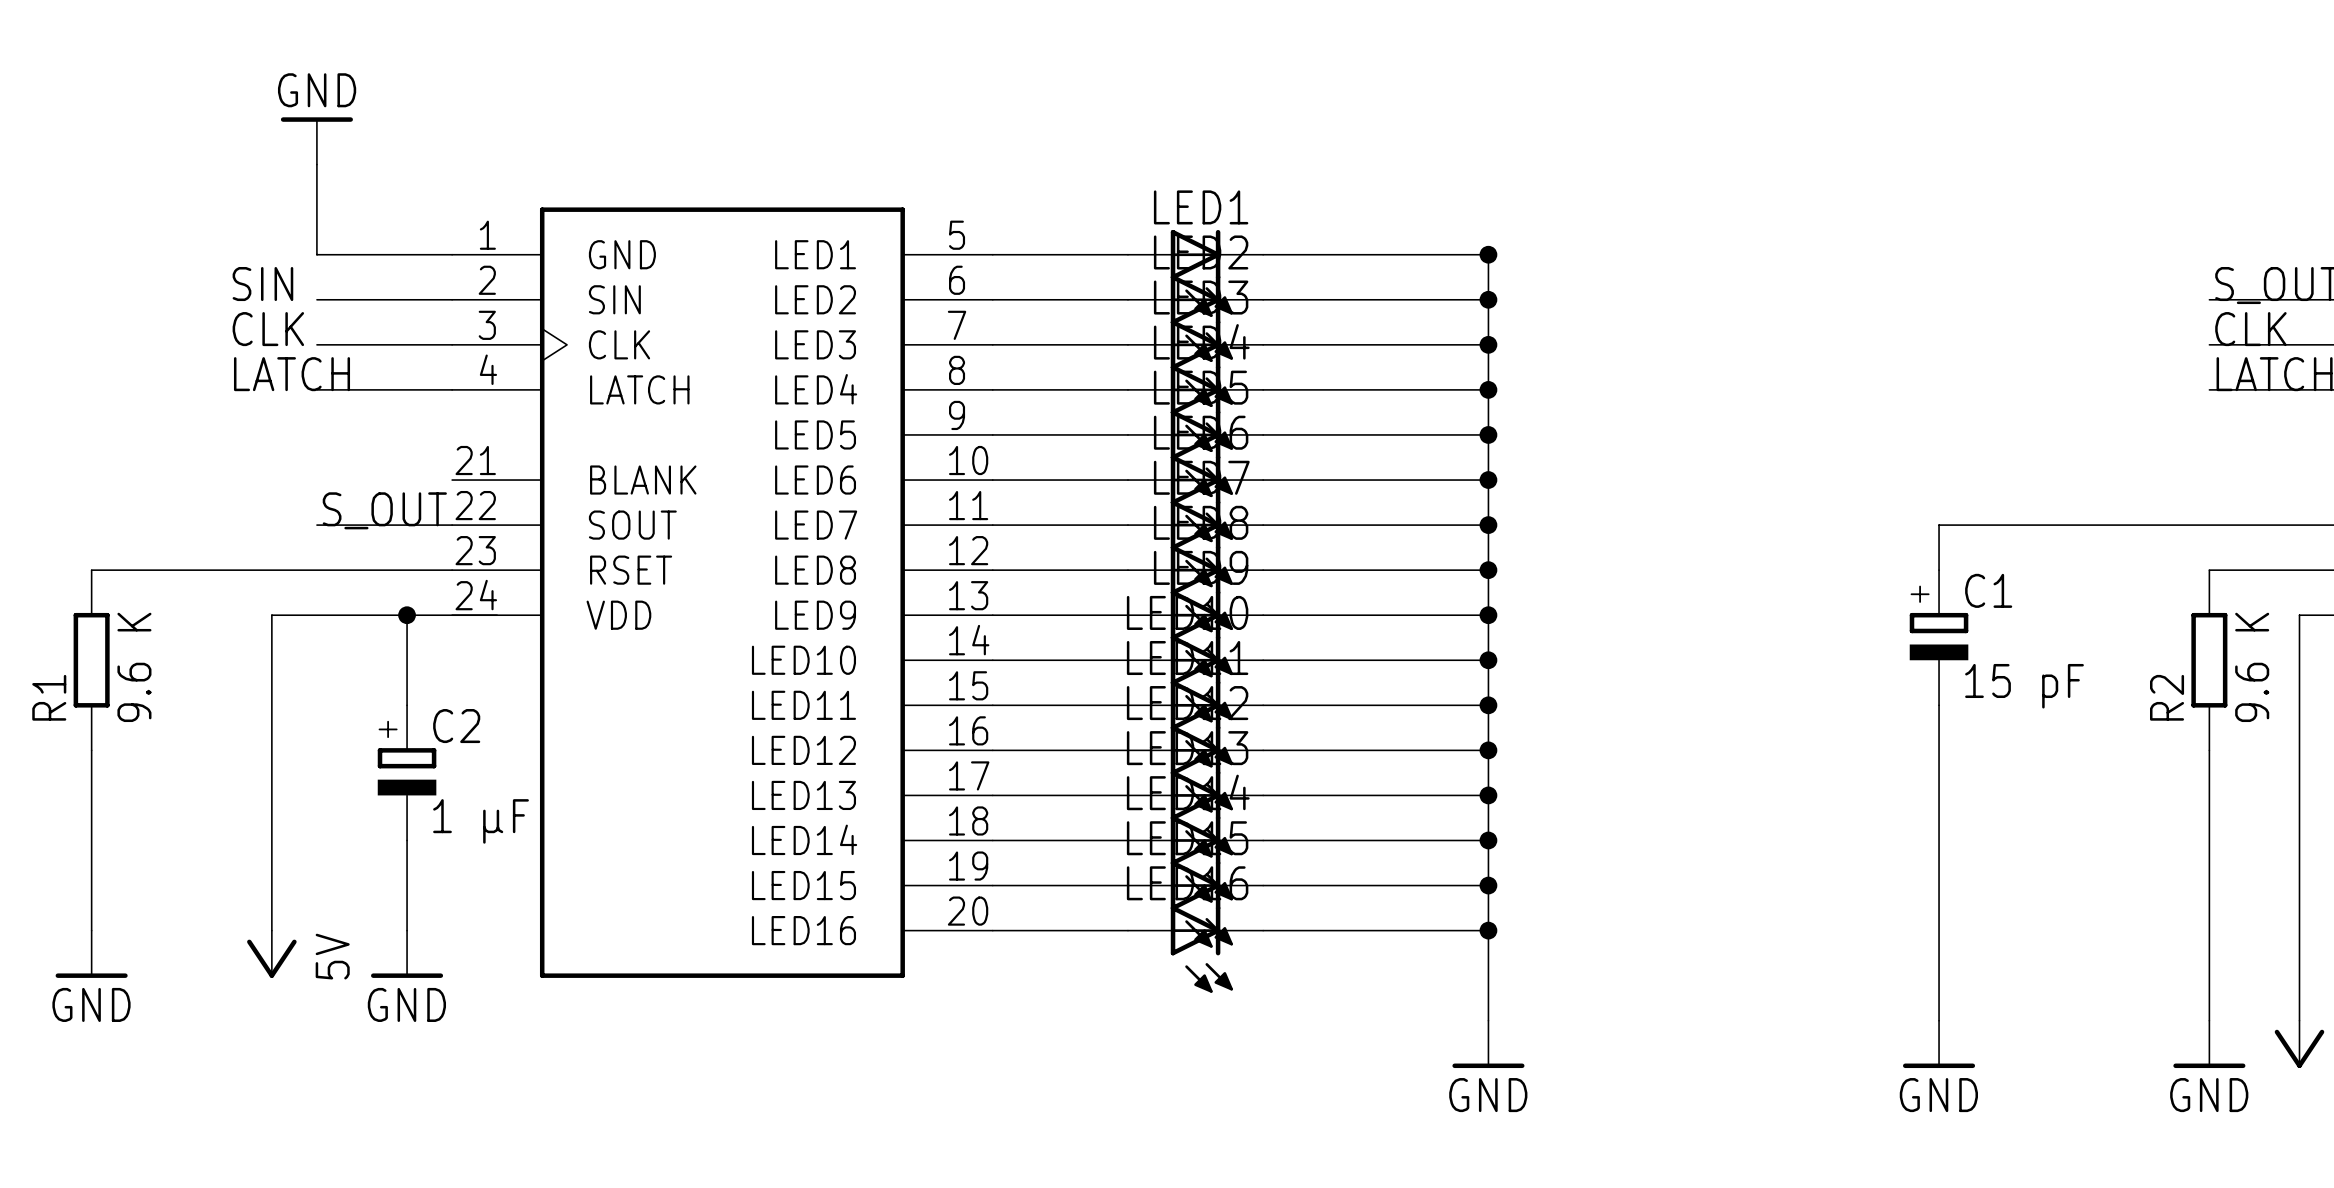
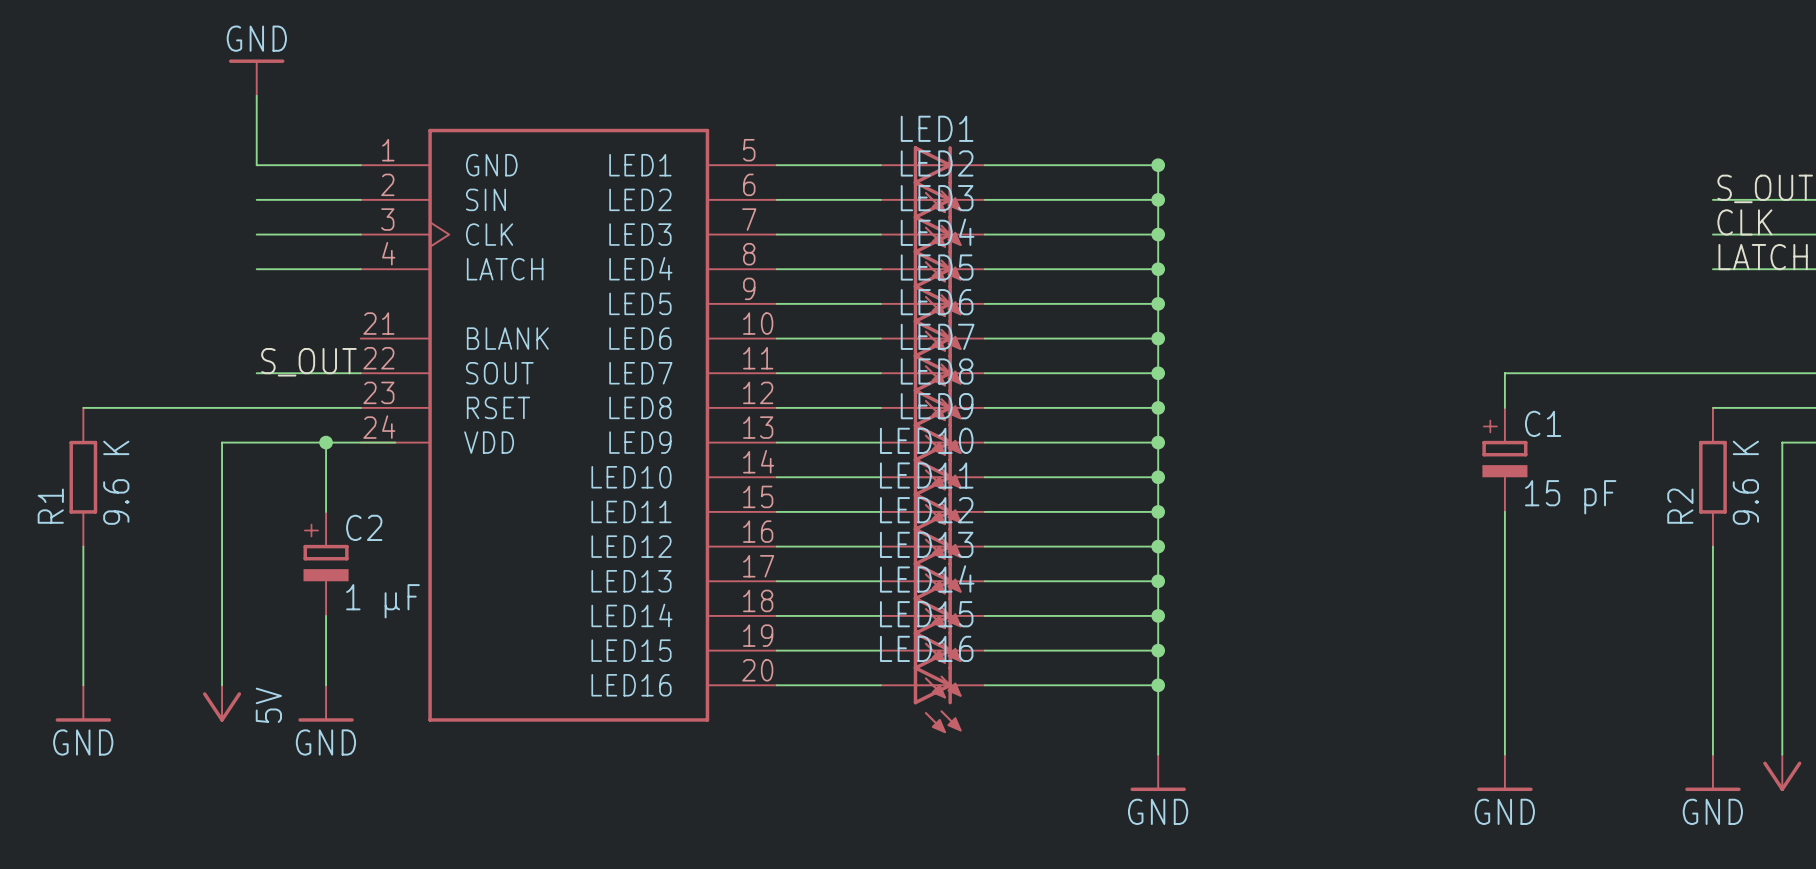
label: SIN (262, 284) -> none
label: CLK (268, 329) -> none
label: LATCH (292, 374) -> none

